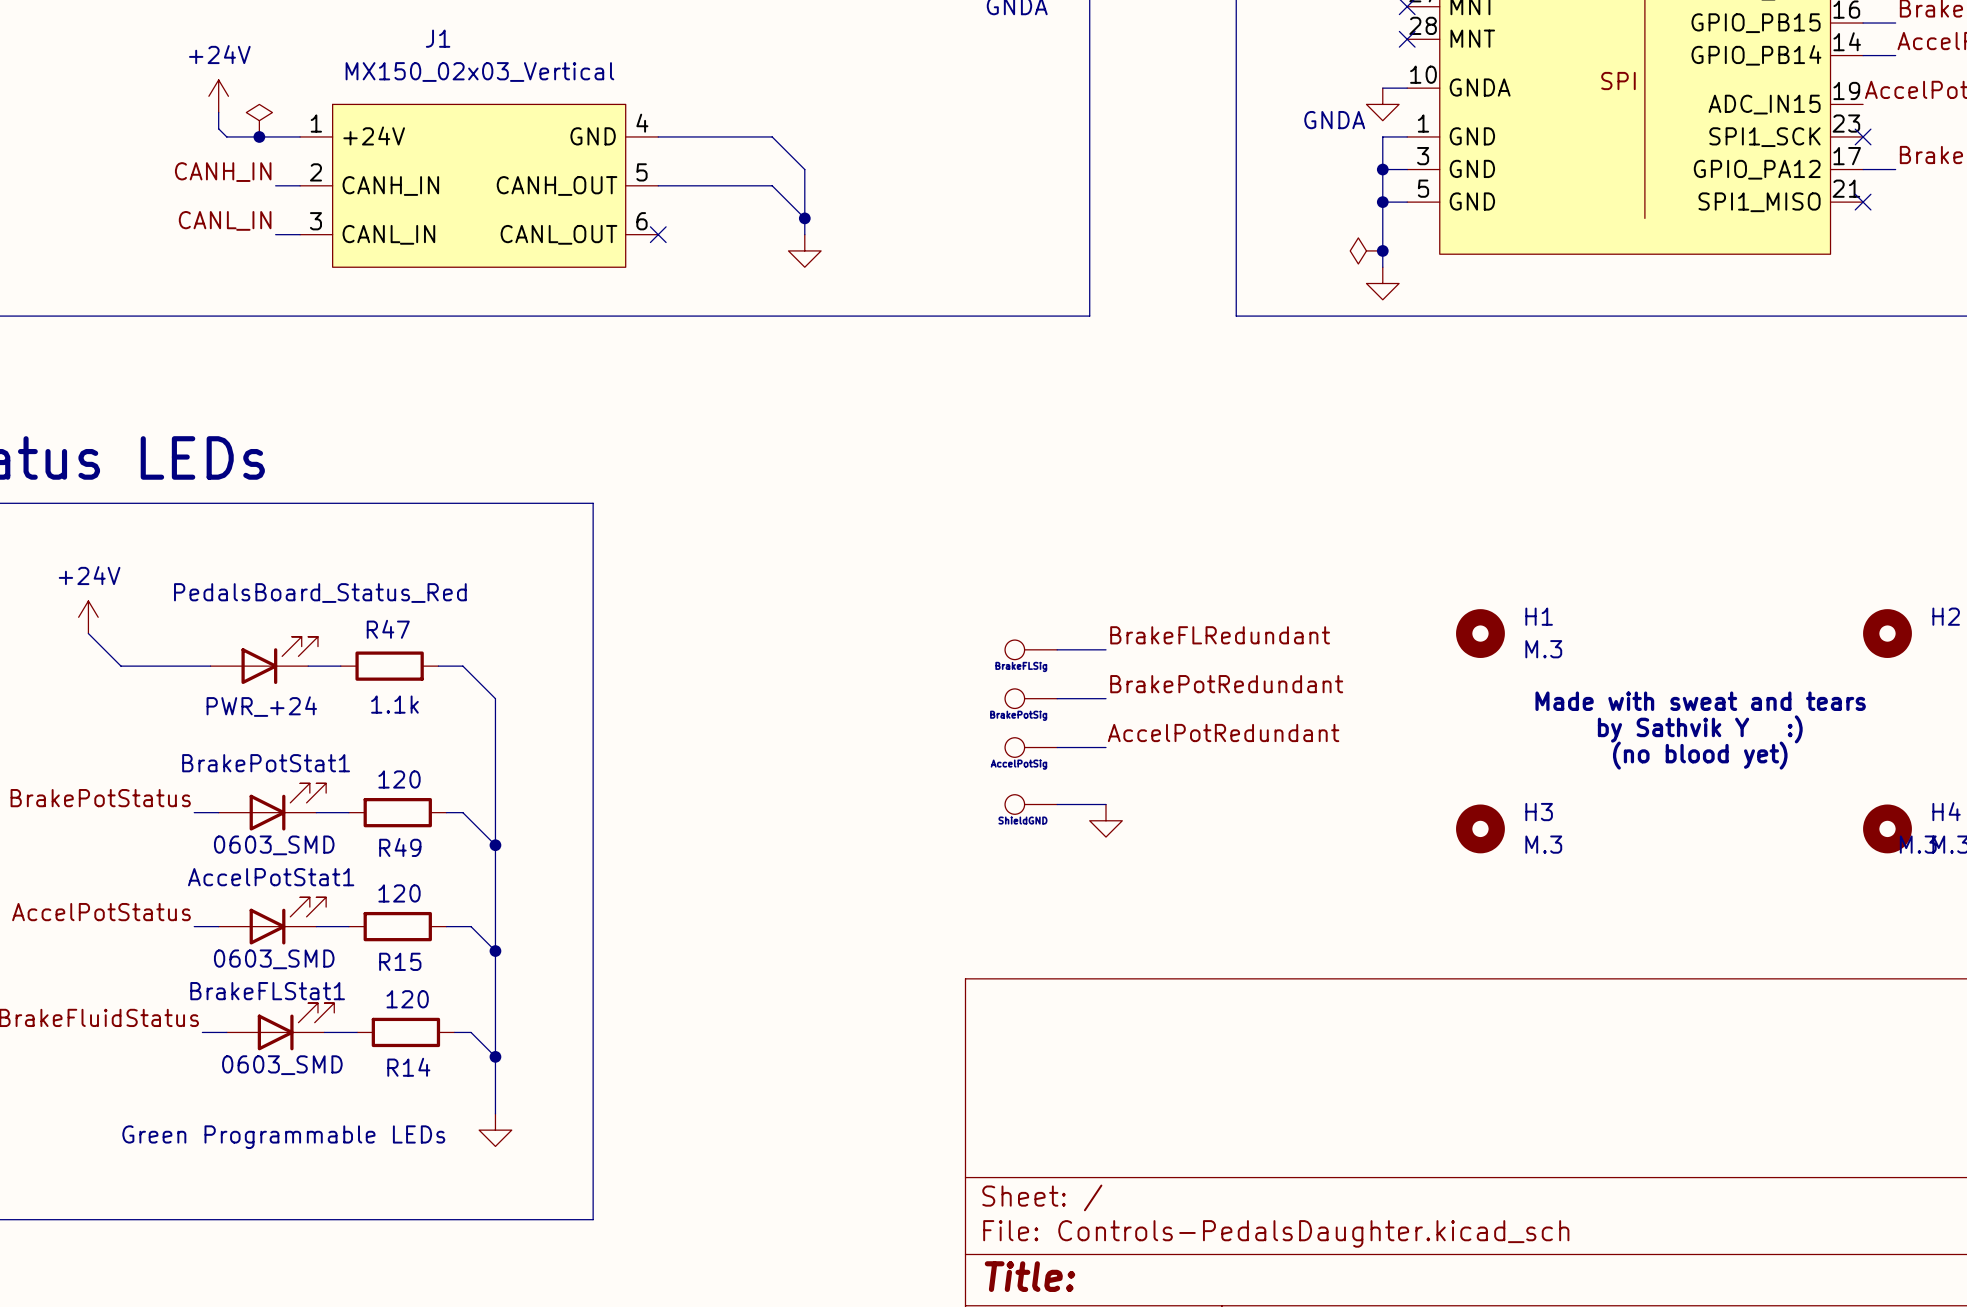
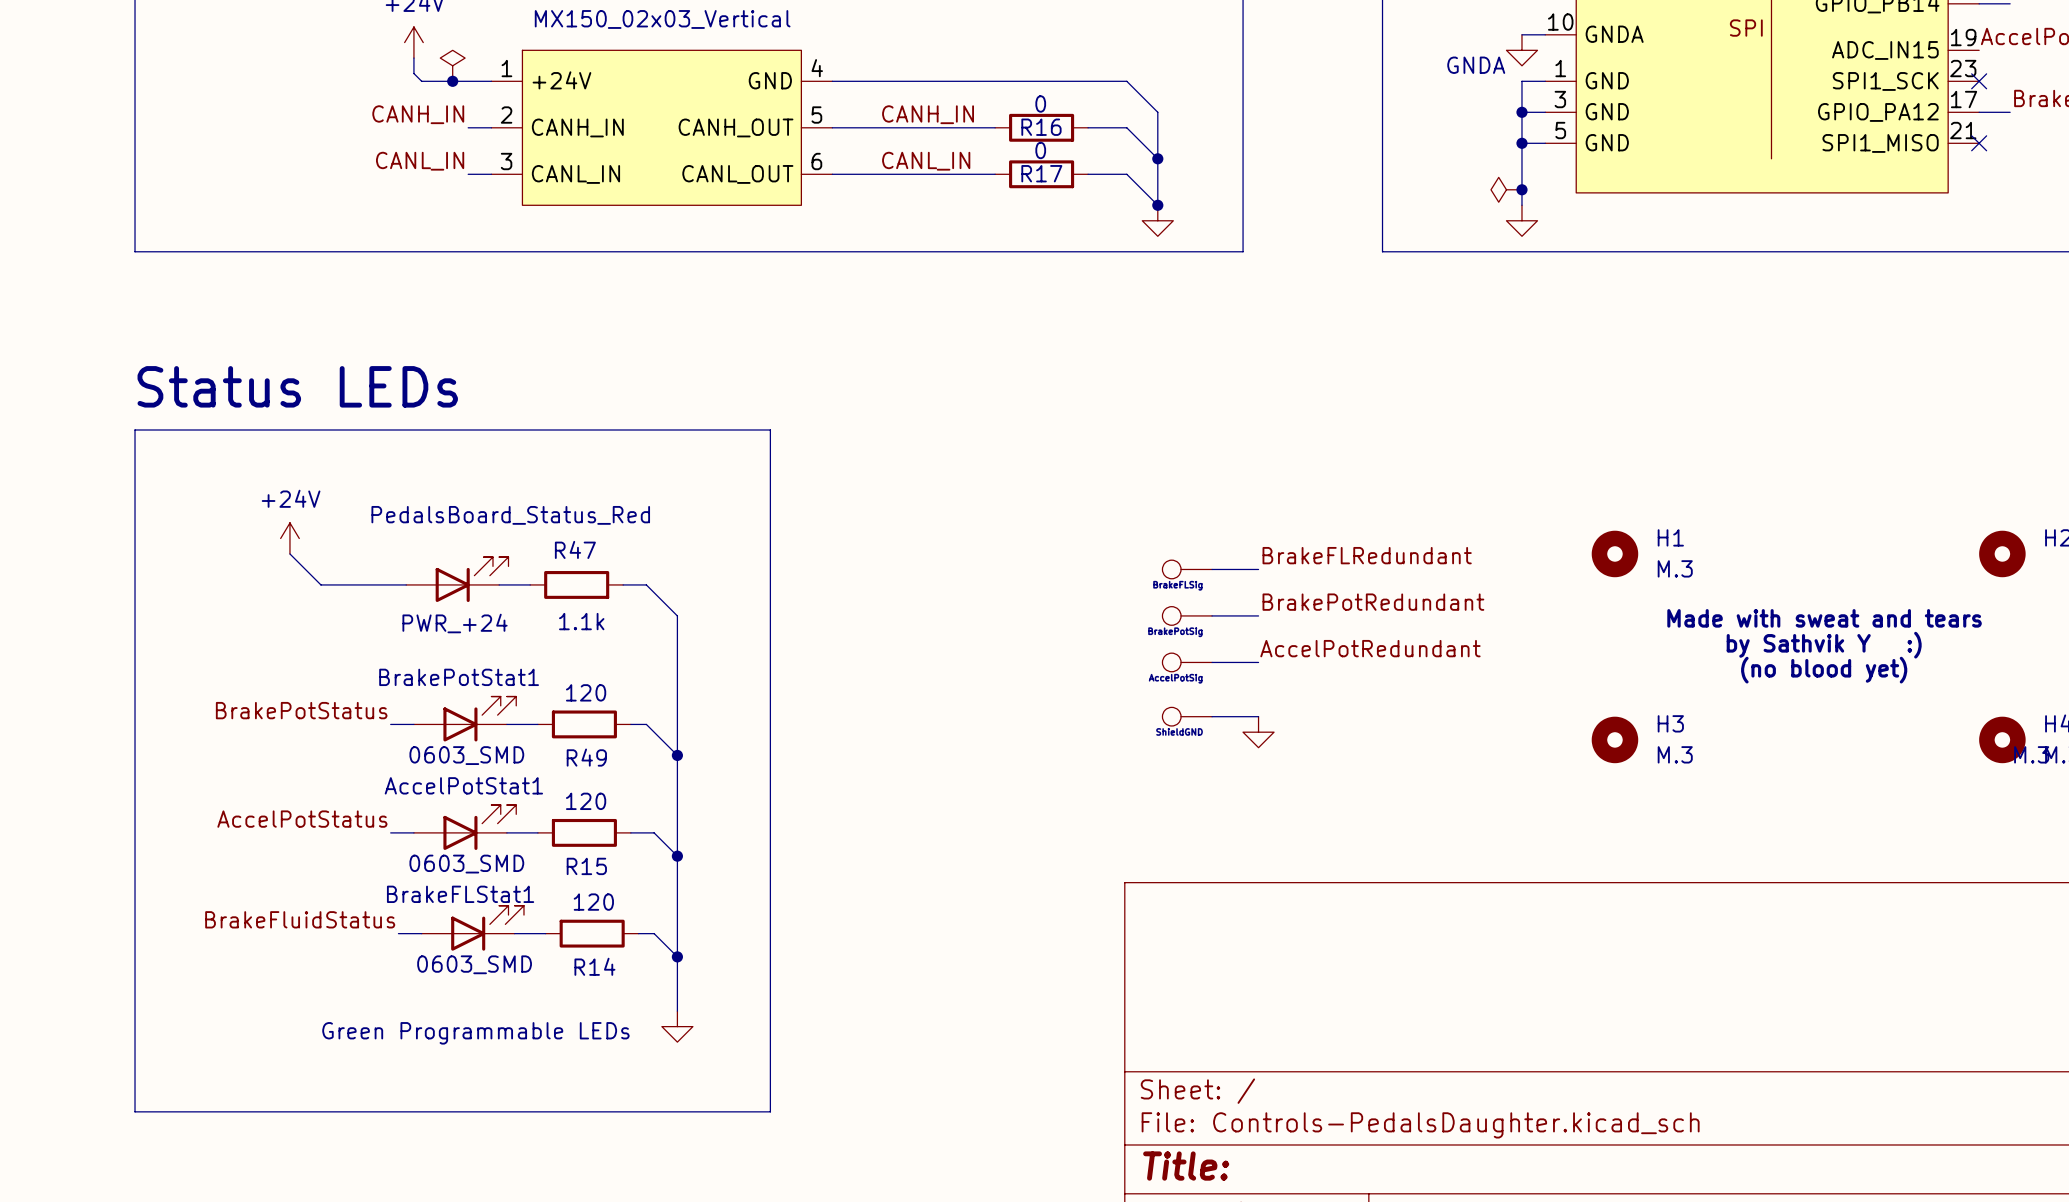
wire: (772, 136) (804, 169) (804, 234) -> (940, 81) (1126, 81) (1157, 112) (1157, 205) (1126, 174) (1088, 174)
label: none -> CANH_IN (928, 114)
wire: (772, 185) (804, 218) -> (940, 127) (995, 127)
R16: none -> 0 (1041, 127)
wire: none -> (1088, 127) (1126, 127) (1157, 158)
junction: (804, 218) -> none
junction: none -> (1157, 158)
label: none -> CANL_IN (926, 161)
wire: none -> (832, 174) (995, 174)
no-connect mark: (658, 234) -> none
R17: none -> 0 (1041, 174)
power symbol position: (804, 250) -> (1157, 220)
junction: none -> (1157, 205)

